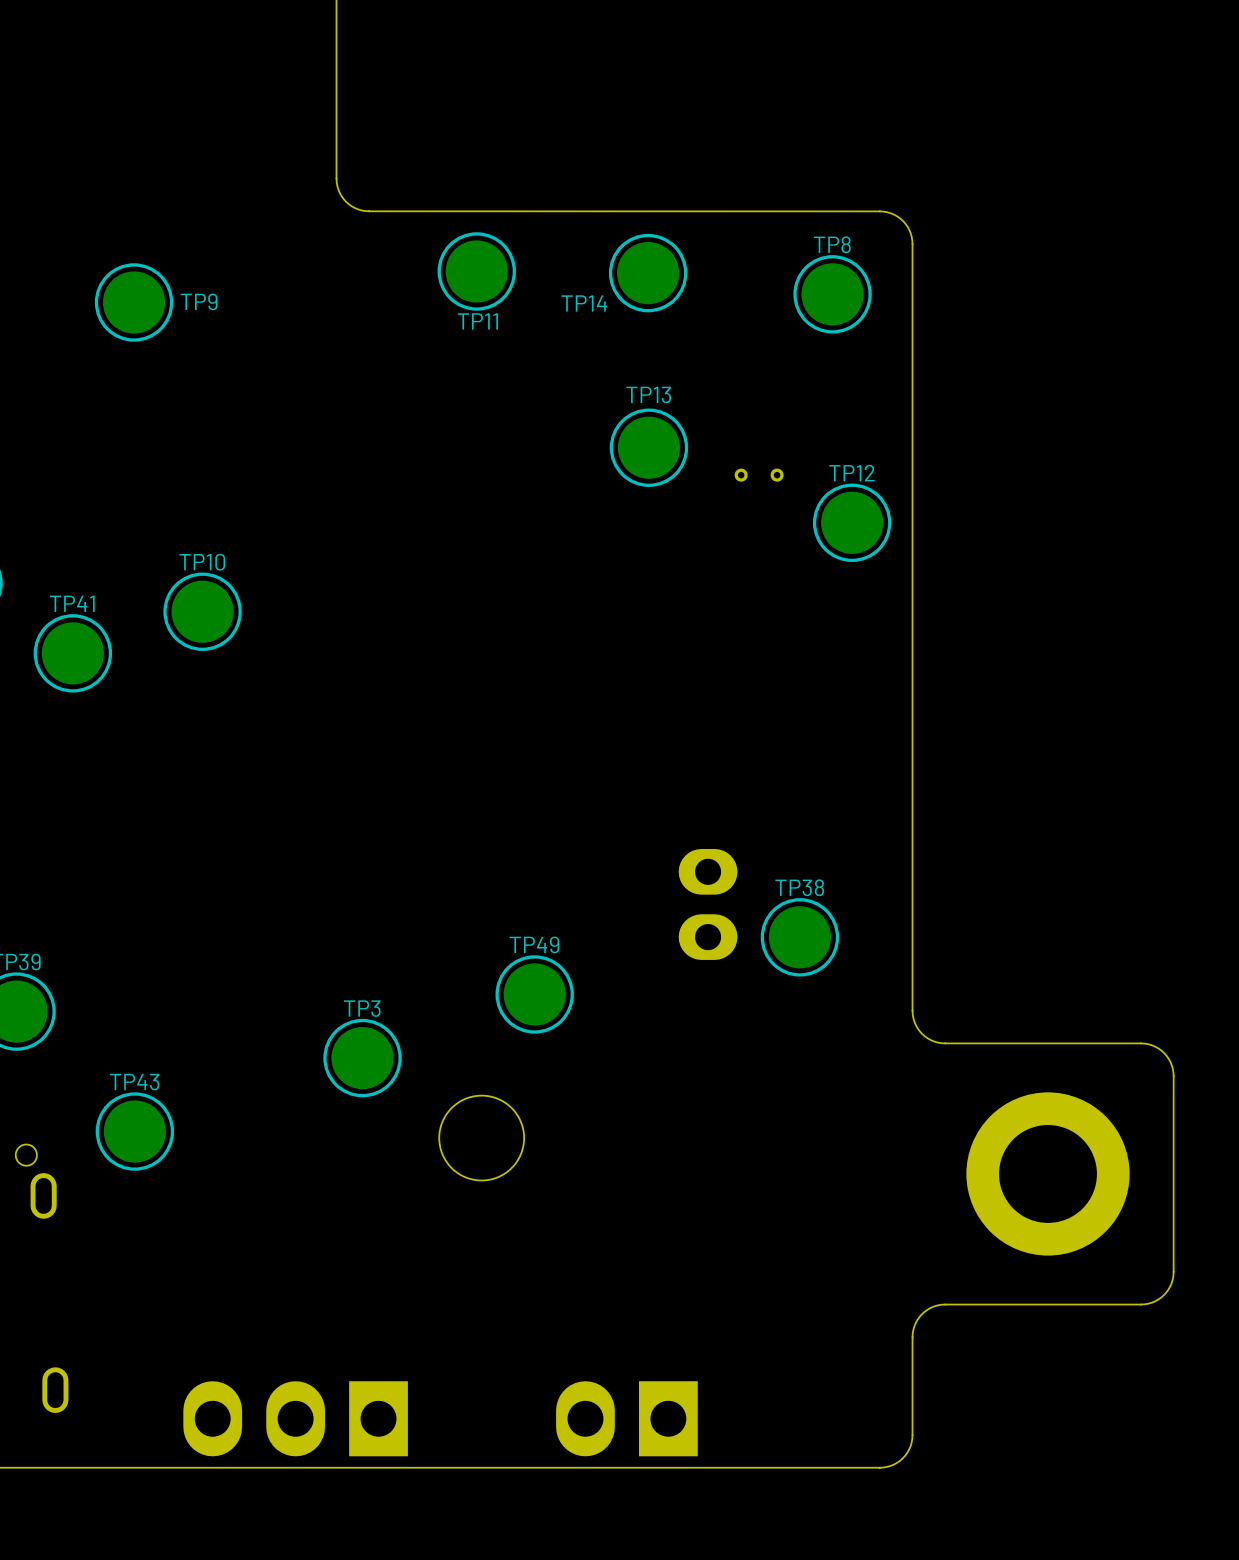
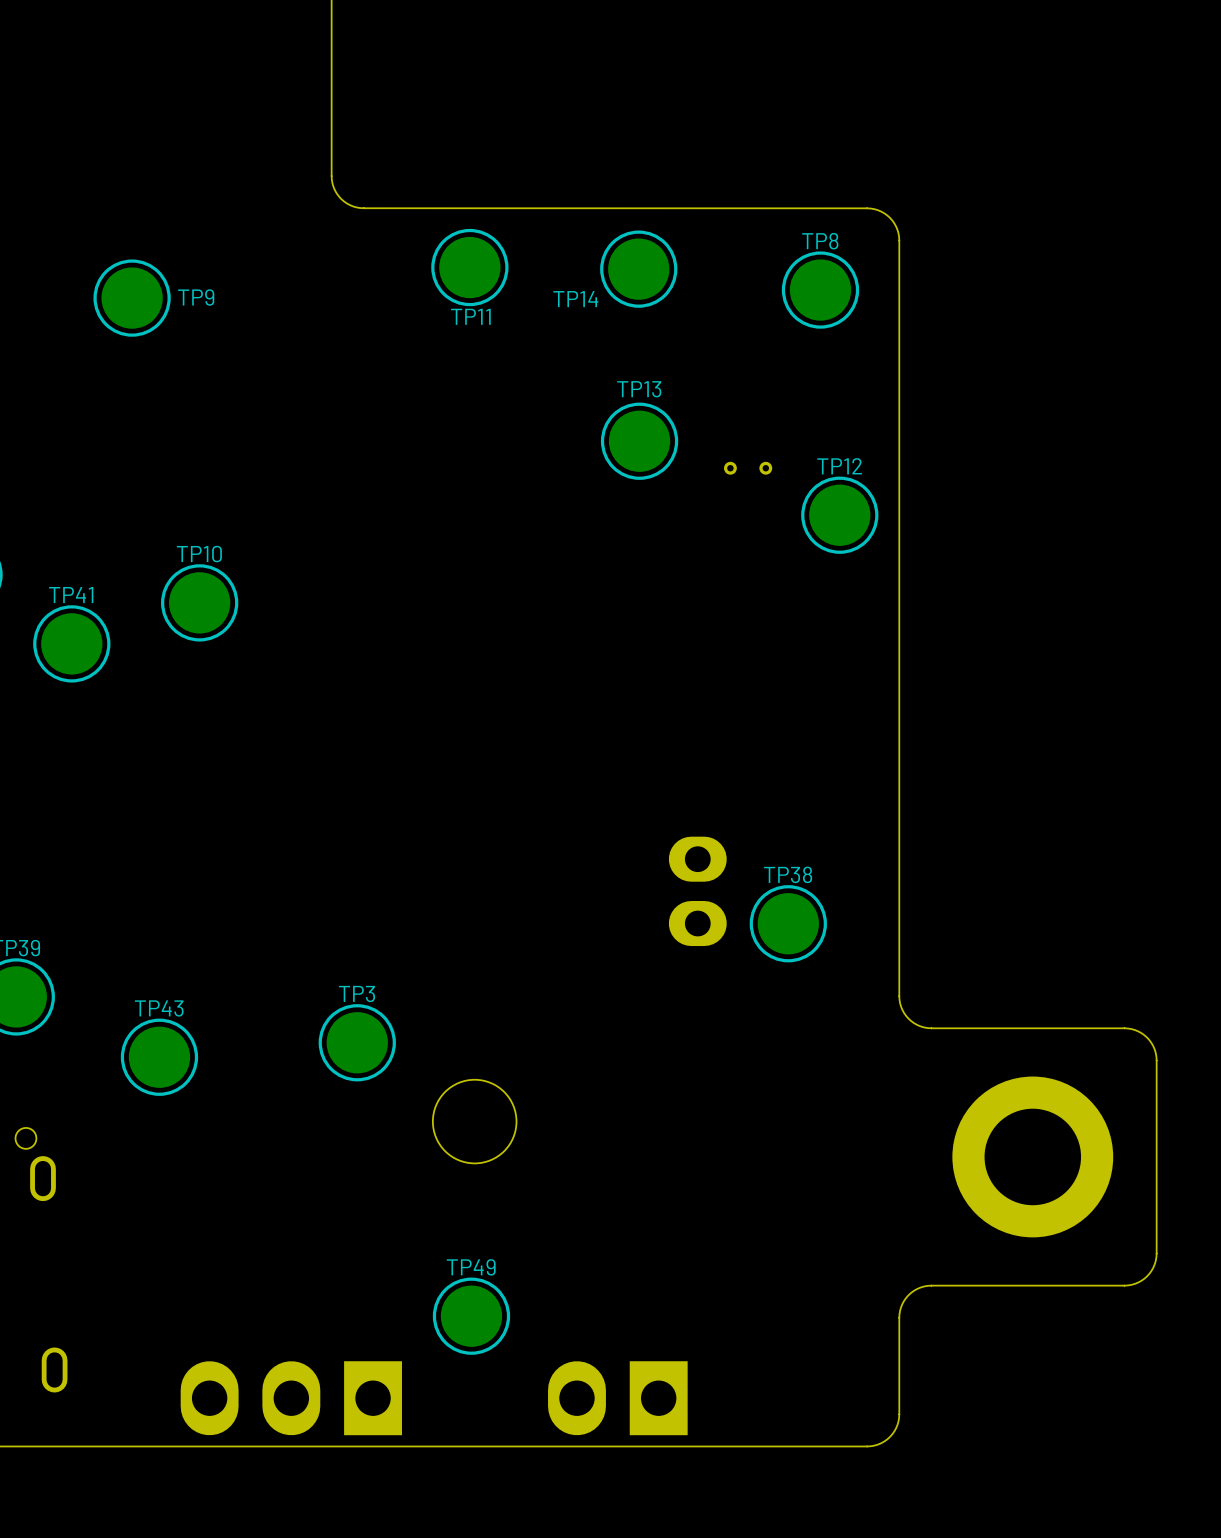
TP49 position: (534, 994) -> (471, 1316)
TP43 position: (134, 1131) -> (159, 1057)

